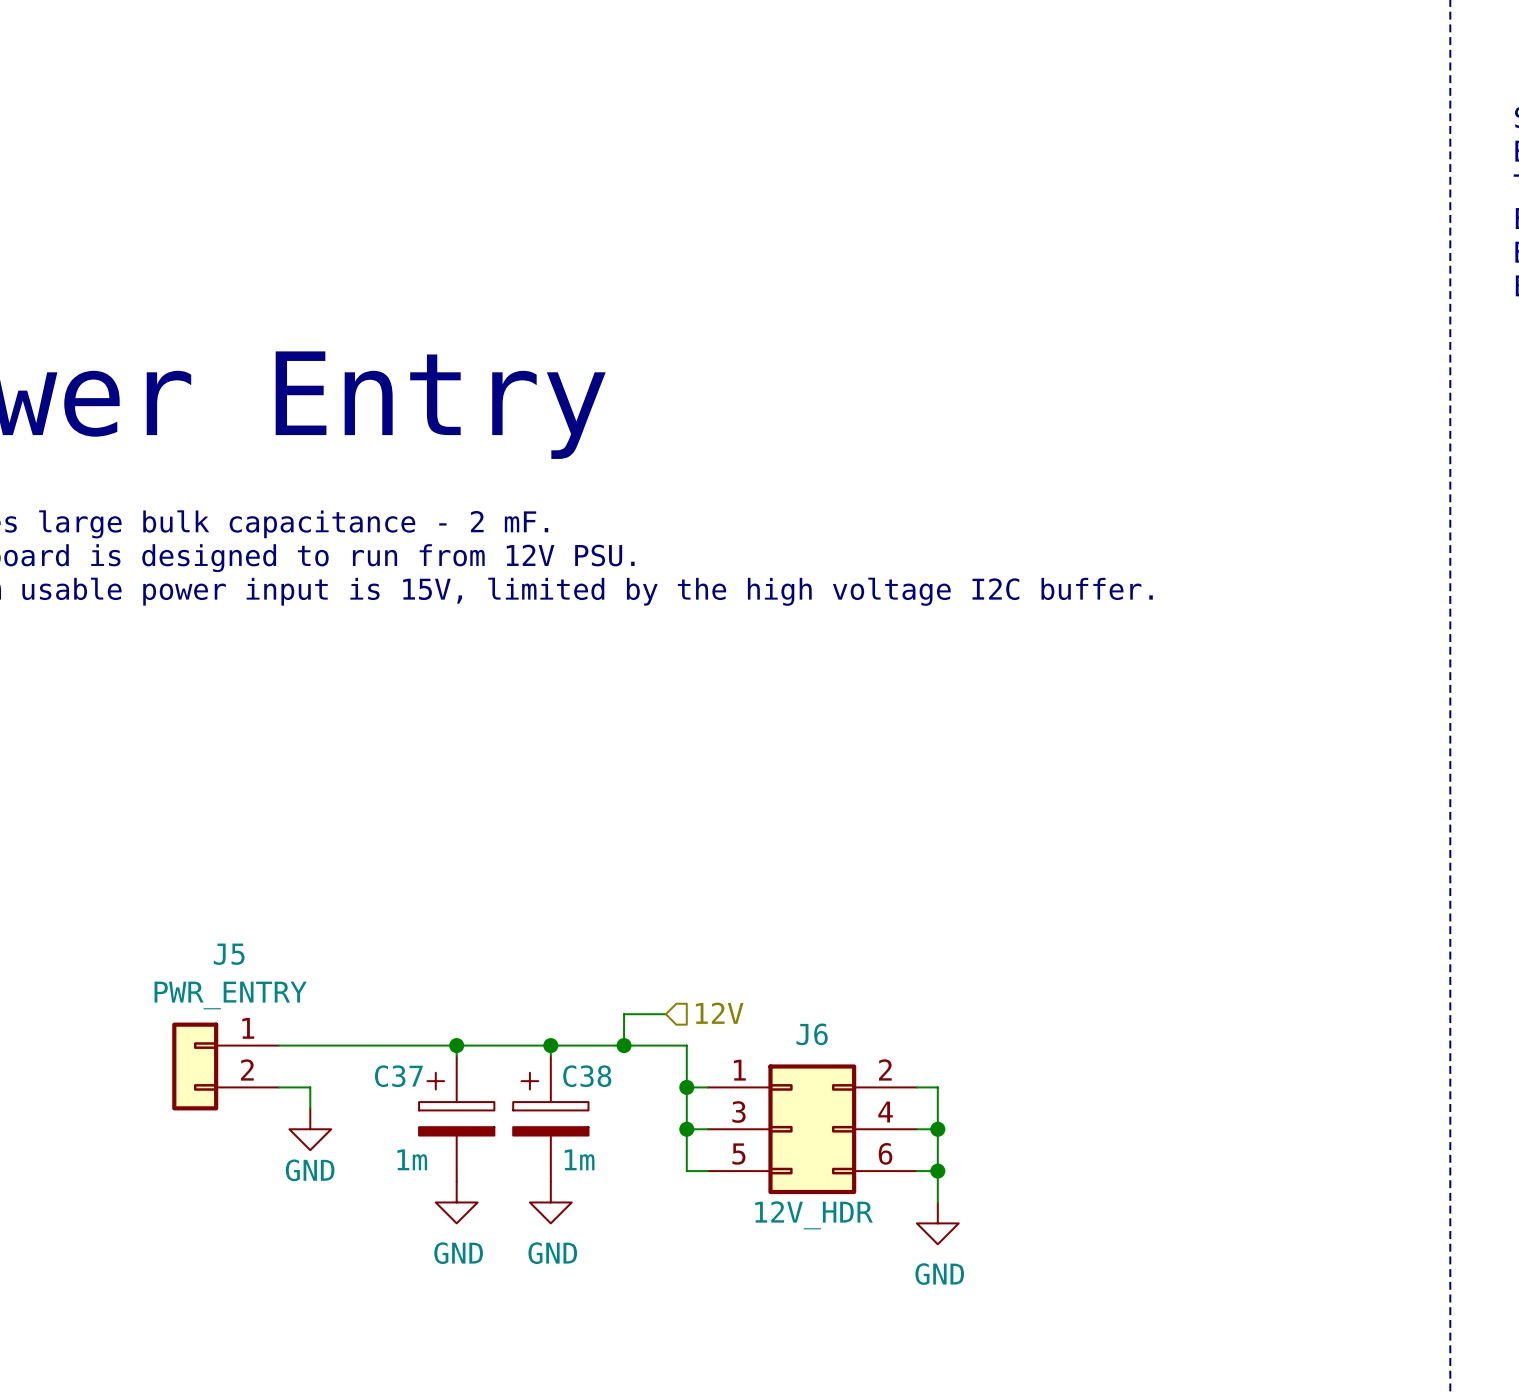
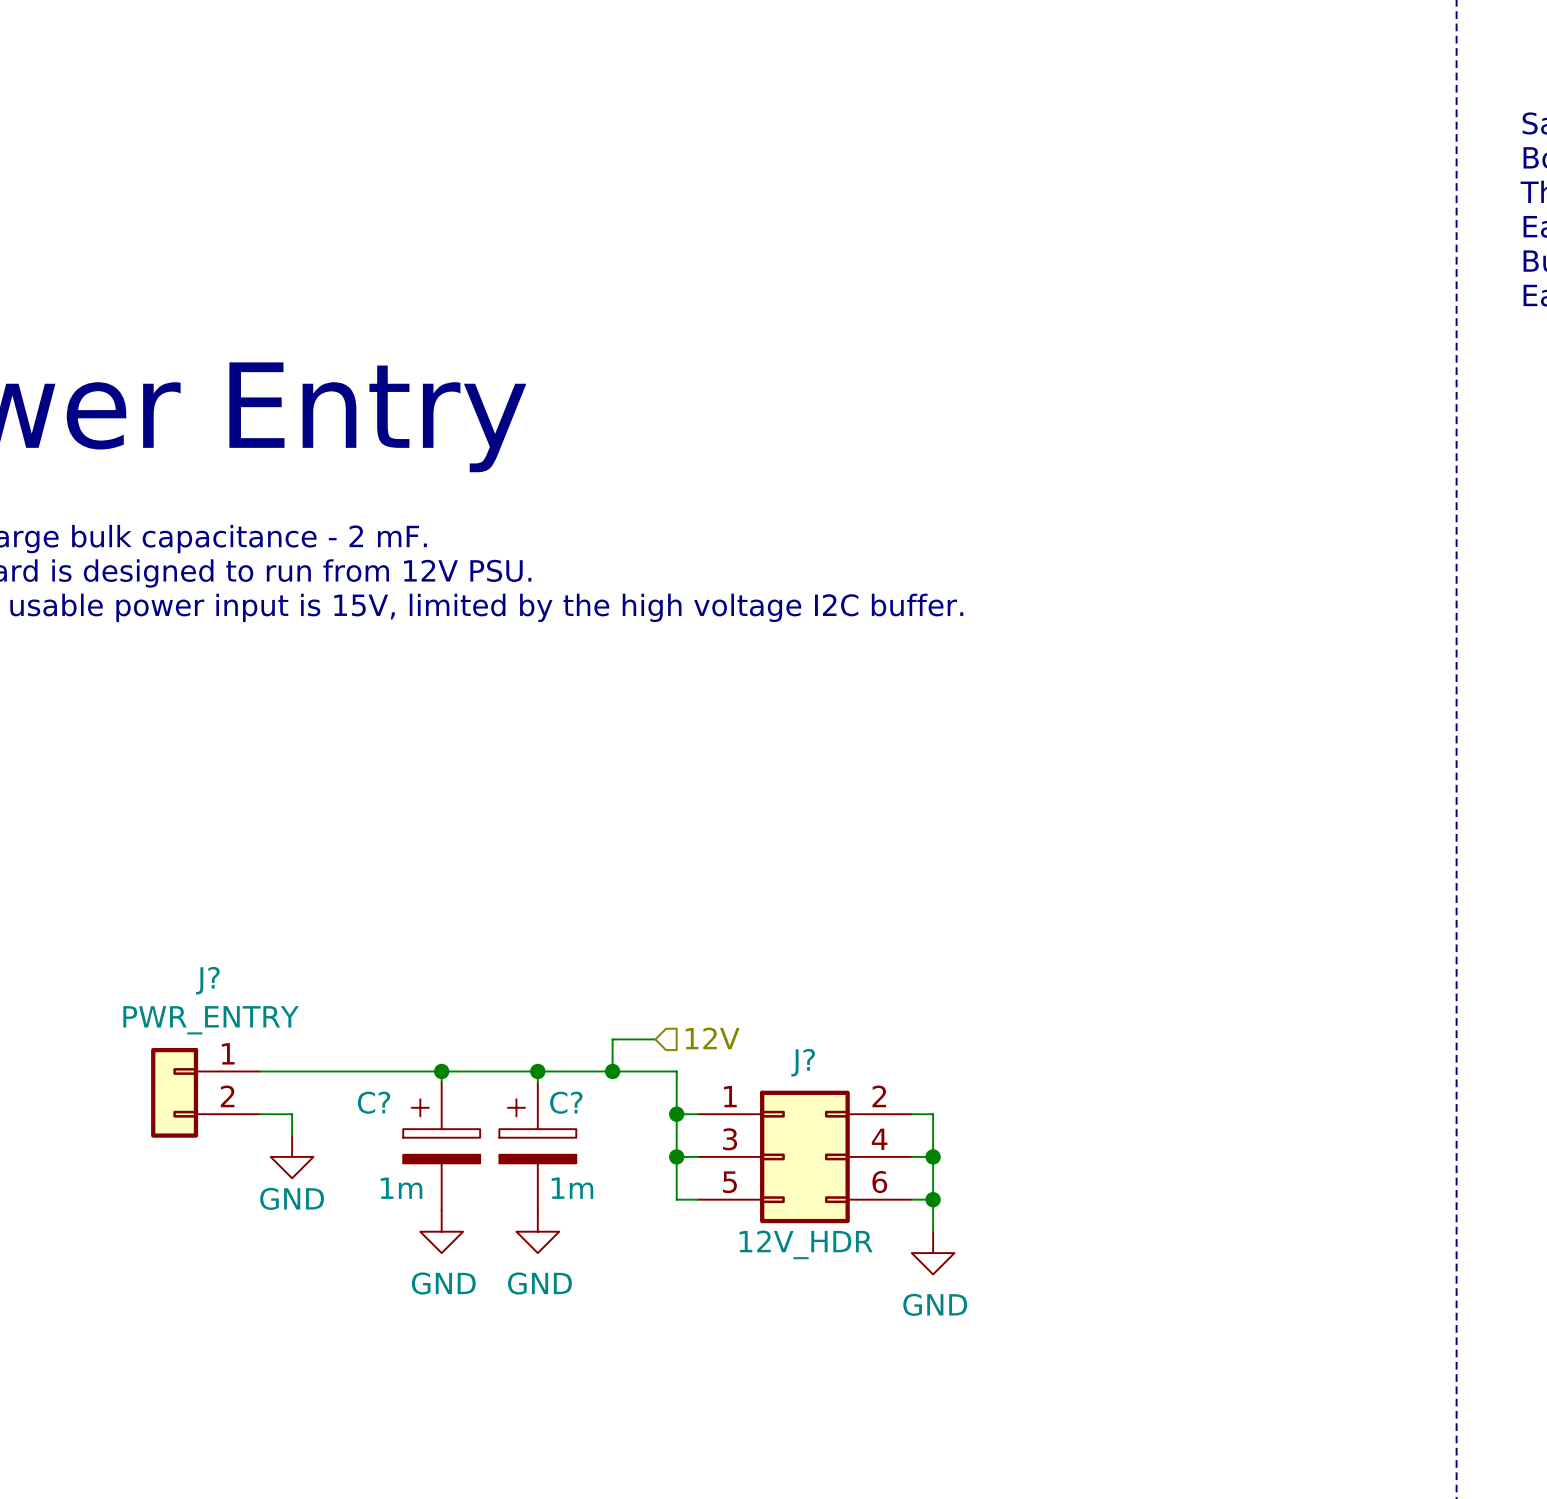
J5 name: J5 (229, 954) -> J? (207, 980)
J6 name: J6 (812, 1034) -> J? (803, 1062)
C37 name: C37 (398, 1076) -> C? (374, 1102)
C38 name: C38 (587, 1076) -> C? (566, 1102)

